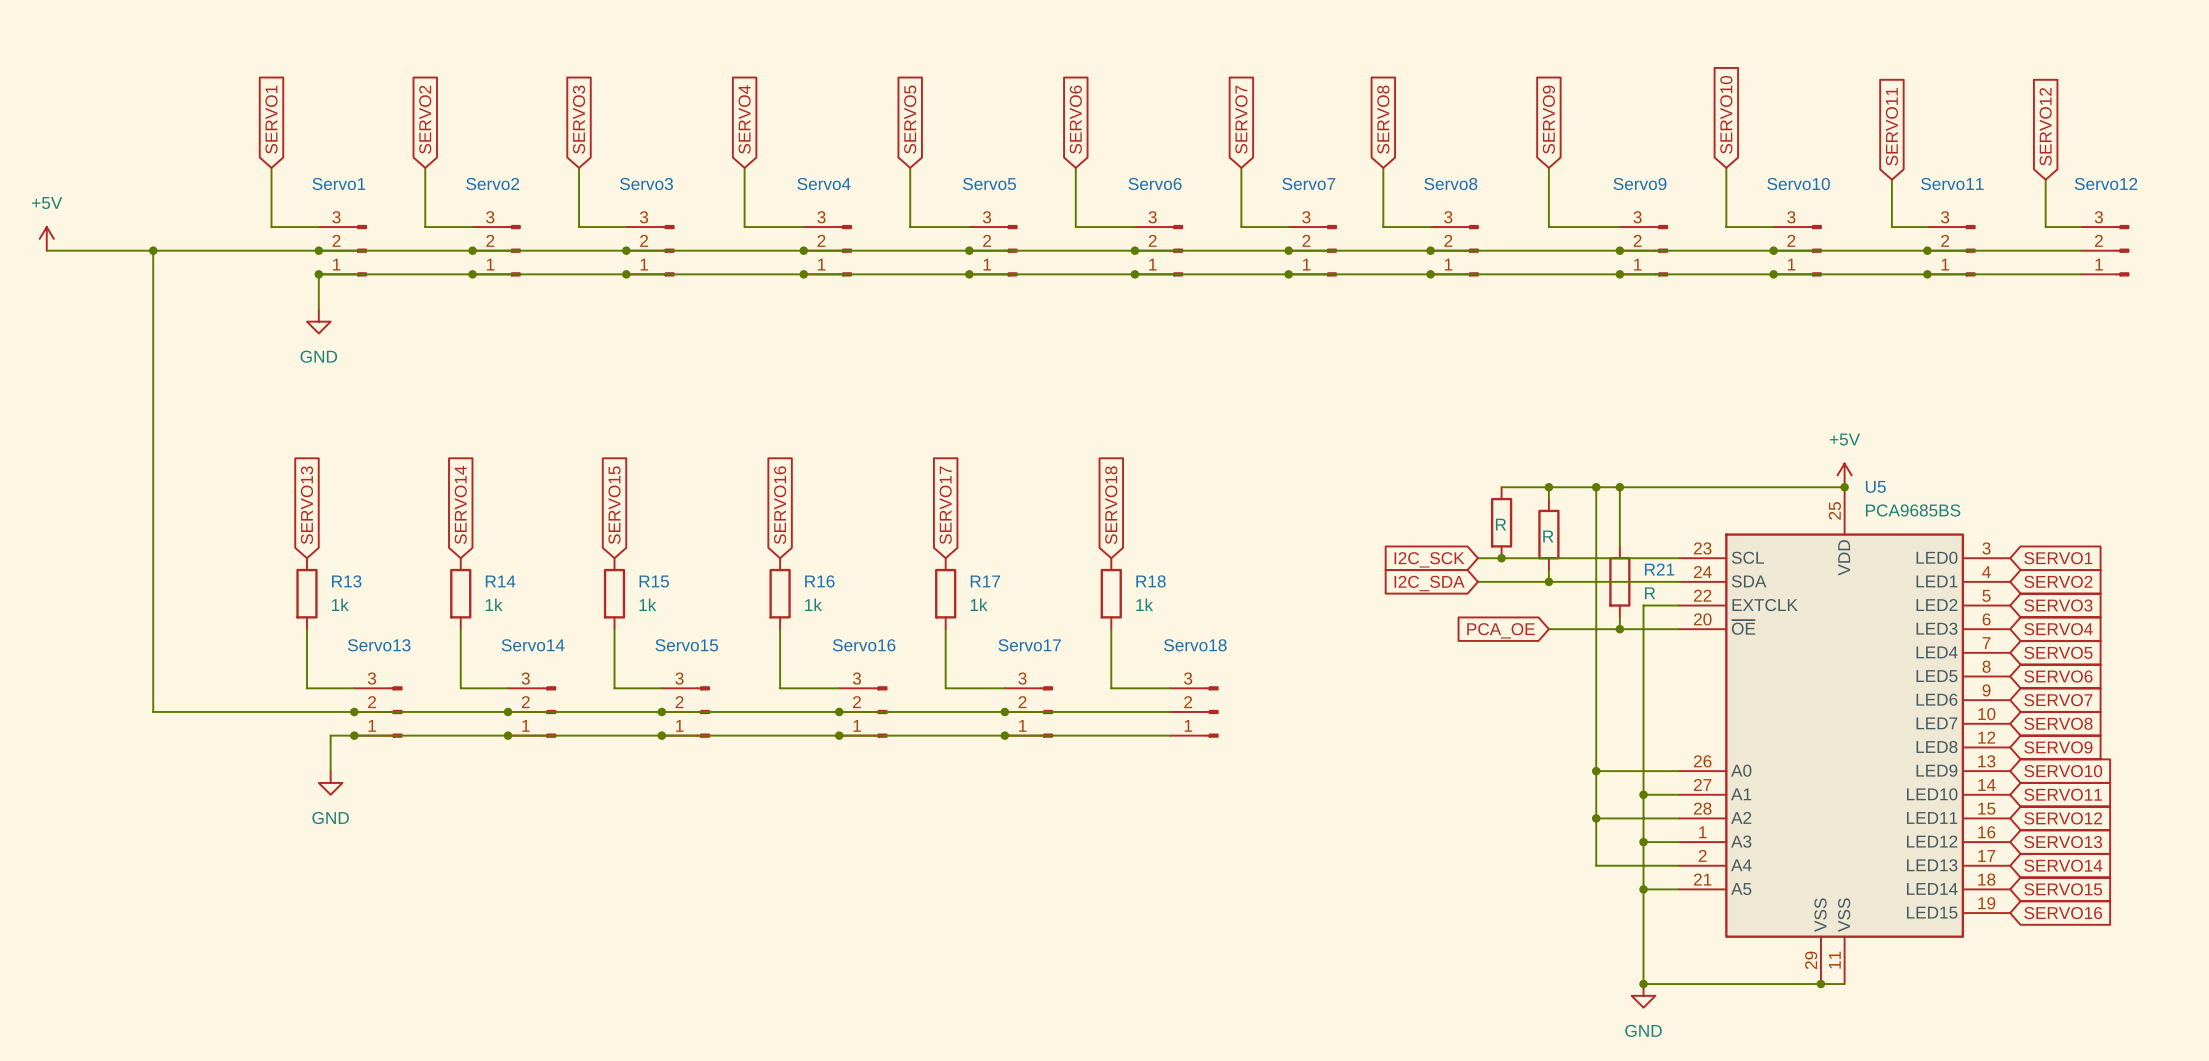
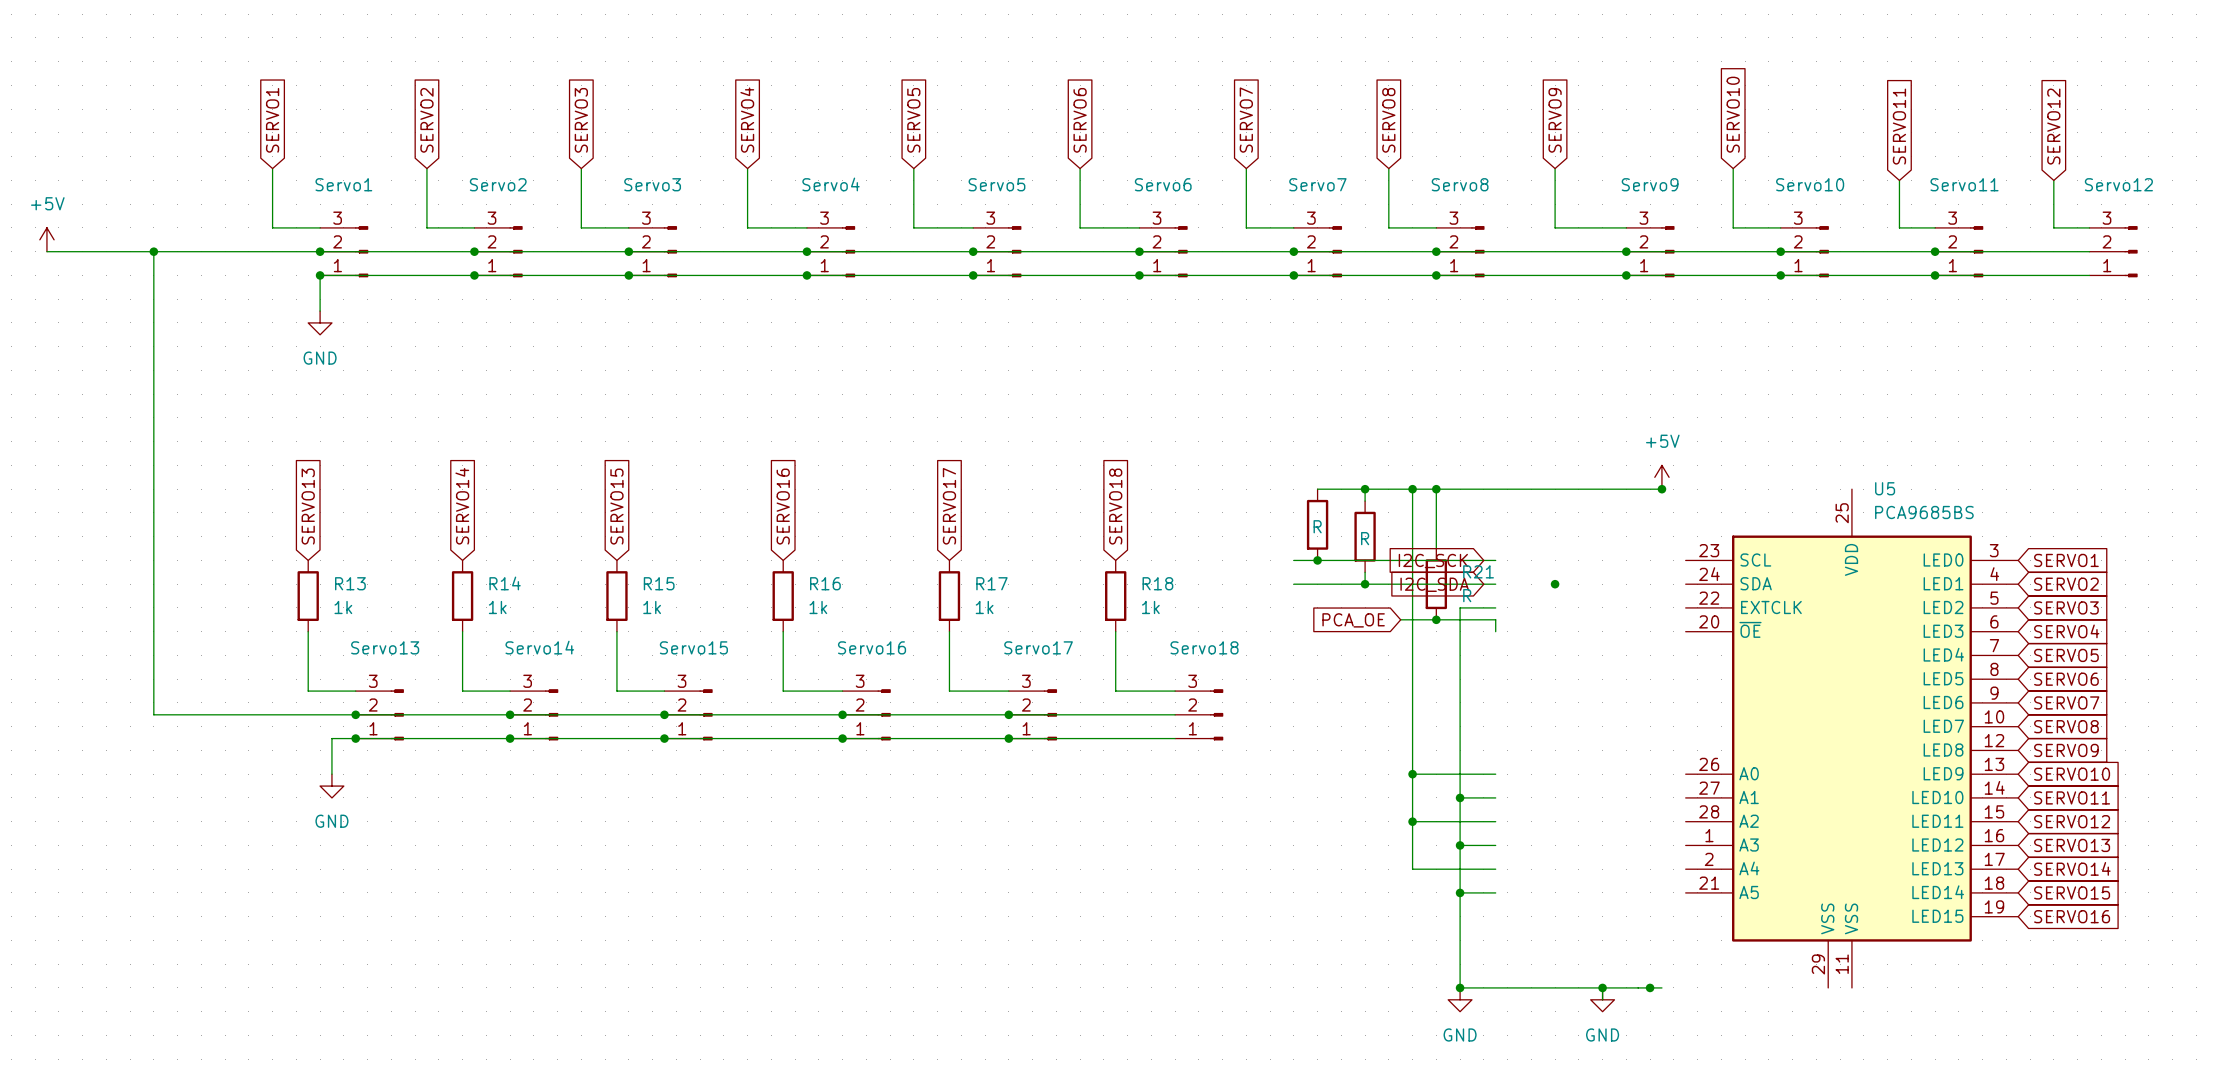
power symbol position: +5V (1844, 475) -> +5V (1661, 477)
wire: none -> (1317, 489) (1507, 489)
junction: none -> (1365, 489)
junction: none -> (1412, 489)
junction: none -> (1436, 489)
wire: (1548, 487) (1548, 499) -> (1365, 489) (1365, 501)
junction: (1548, 487) -> none
wire: (1596, 487) (1596, 865) (1679, 865) -> (1412, 489) (1412, 869) (1495, 869)
junction: (1596, 487) -> none
wire: (1619, 487) (1619, 546) -> (1436, 489) (1436, 548)
junction: (1619, 487) -> none
wire: (1655, 487) (1844, 487) -> none
junction: none -> (1661, 489)
junction: (1844, 487) -> none
part: none -> R (1317, 524)
part: R (1501, 522) -> none
part: none -> R (1365, 536)
part: R (1548, 534) -> none
junction: none -> (1317, 560)
wire: (1489, 558) (1679, 558) -> (1293, 560) (1483, 560)
junction: (1501, 558) -> none
wire: (1548, 570) (1548, 581) -> (1365, 572) (1365, 584)
junction: none -> (1365, 584)
wire: (1489, 581) (1679, 581) -> (1293, 584) (1483, 584)
R21 position: (1619, 581) -> (1436, 584)
wire: (1679, 605) (1643, 605) (1643, 984) -> (1495, 607) (1460, 607) (1460, 987) (1650, 987)
wire: none -> (1400, 619) (1495, 619) (1495, 631)
junction: none -> (1436, 619)
wire: (1619, 617) (1619, 629) -> none
wire: (1548, 629) (1679, 629) -> none
junction: (1619, 629) -> none
global label position: PCA_OE (1501, 630) -> PCA_OE (1353, 620)
junction: none -> (1412, 774)
wire: (1596, 771) (1679, 771) -> (1412, 774) (1495, 774)
junction: (1596, 771) -> none
junction: none -> (1460, 797)
wire: (1643, 794) (1679, 794) -> (1460, 797) (1495, 797)
junction: (1643, 794) -> none
junction: none -> (1412, 821)
wire: (1596, 818) (1679, 818) -> (1412, 821) (1495, 821)
junction: (1596, 818) -> none
junction: none -> (1460, 845)
wire: (1643, 842) (1679, 842) -> (1460, 845) (1495, 845)
junction: (1643, 842) -> none
junction: none -> (1460, 892)
wire: (1643, 889) (1679, 889) -> (1460, 892) (1495, 892)
junction: (1643, 889) -> none
junction: none -> (1460, 987)
wire: none -> (1602, 987) (1602, 999)
junction: none -> (1602, 987)
wire: (1655, 984) (1844, 984) -> none
junction: (1820, 984) -> none
power symbol: none -> GND (1460, 999)
power symbol position: GND (1643, 995) -> GND (1602, 999)

